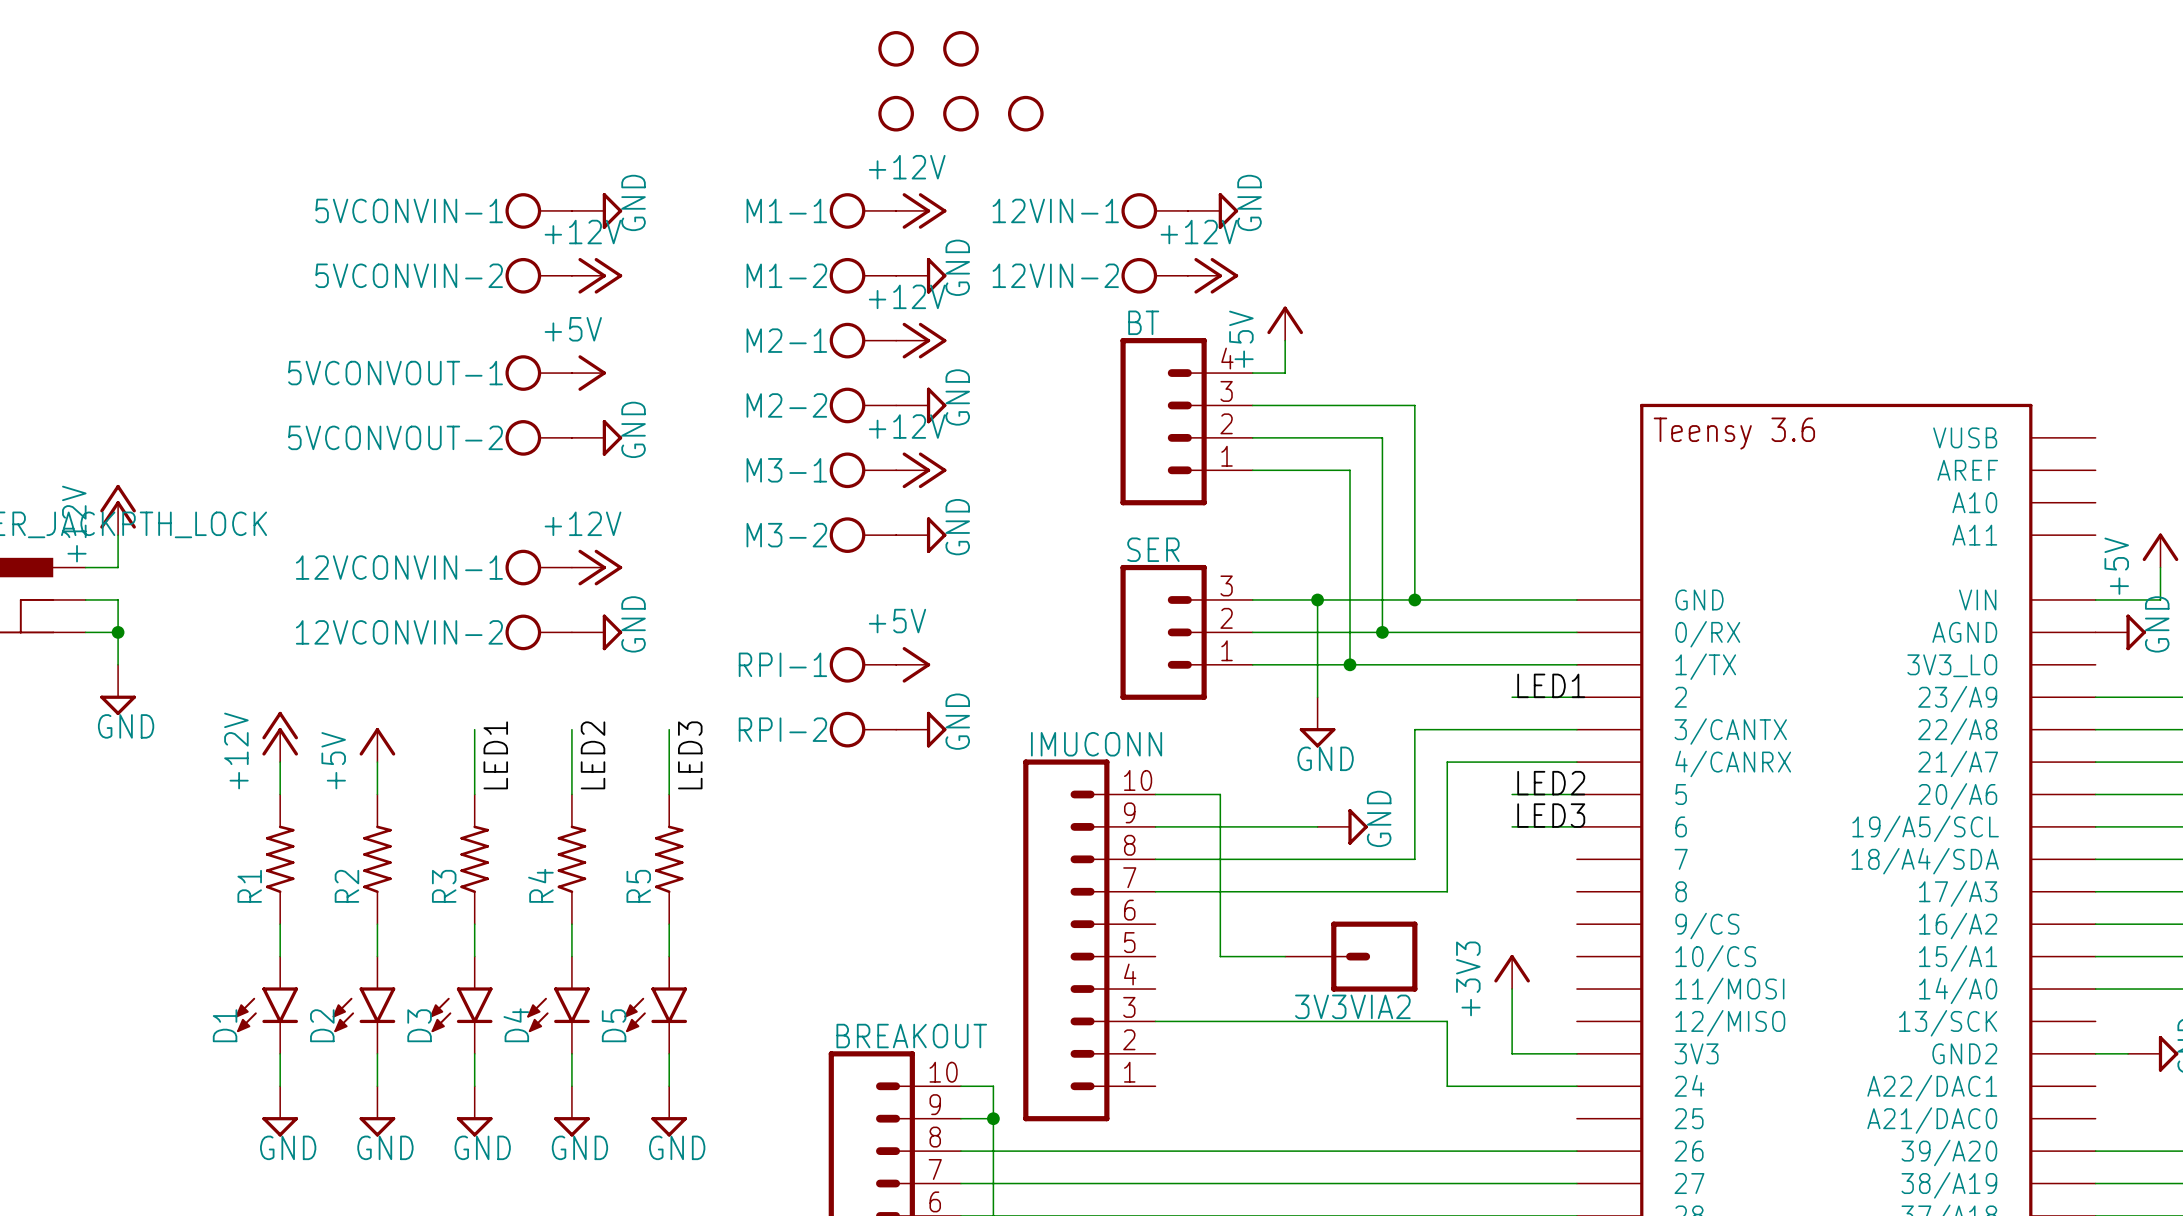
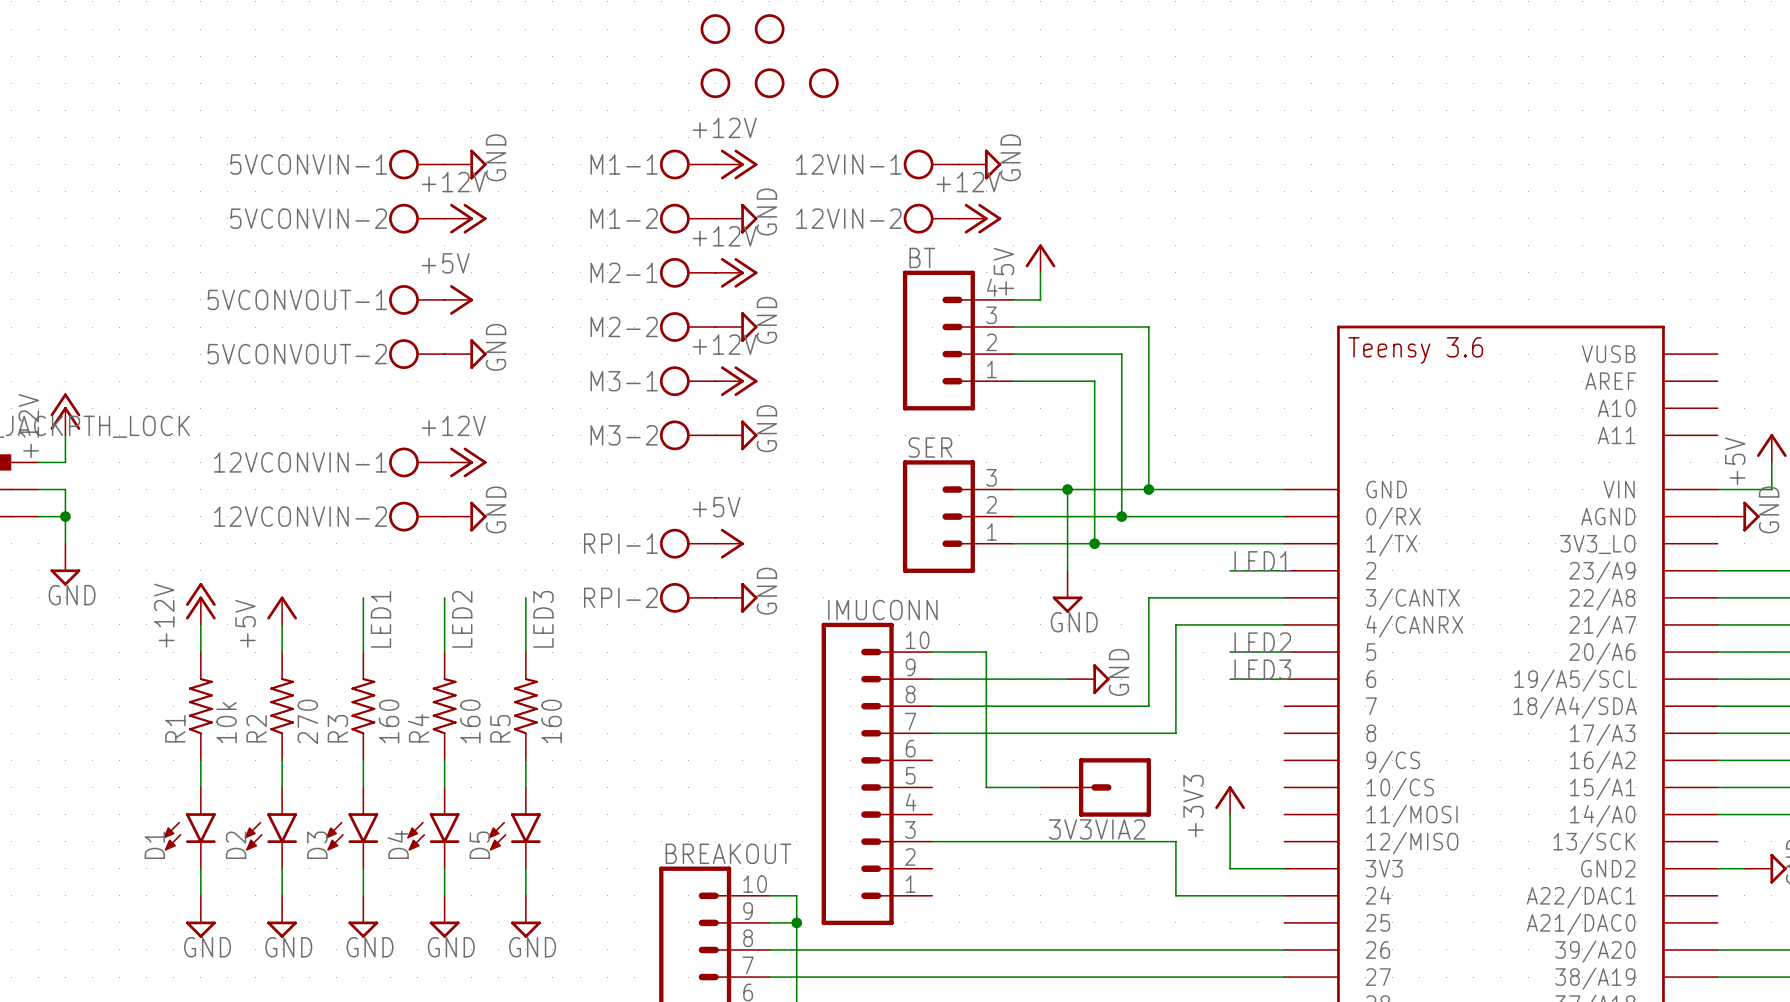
R3 value: none -> 160 (389, 721)
R4 value: none -> 160 (470, 721)
R5 value: none -> 160 (551, 721)
R2 value: none -> 270 (307, 721)
R1 value: none -> 10k (226, 722)

